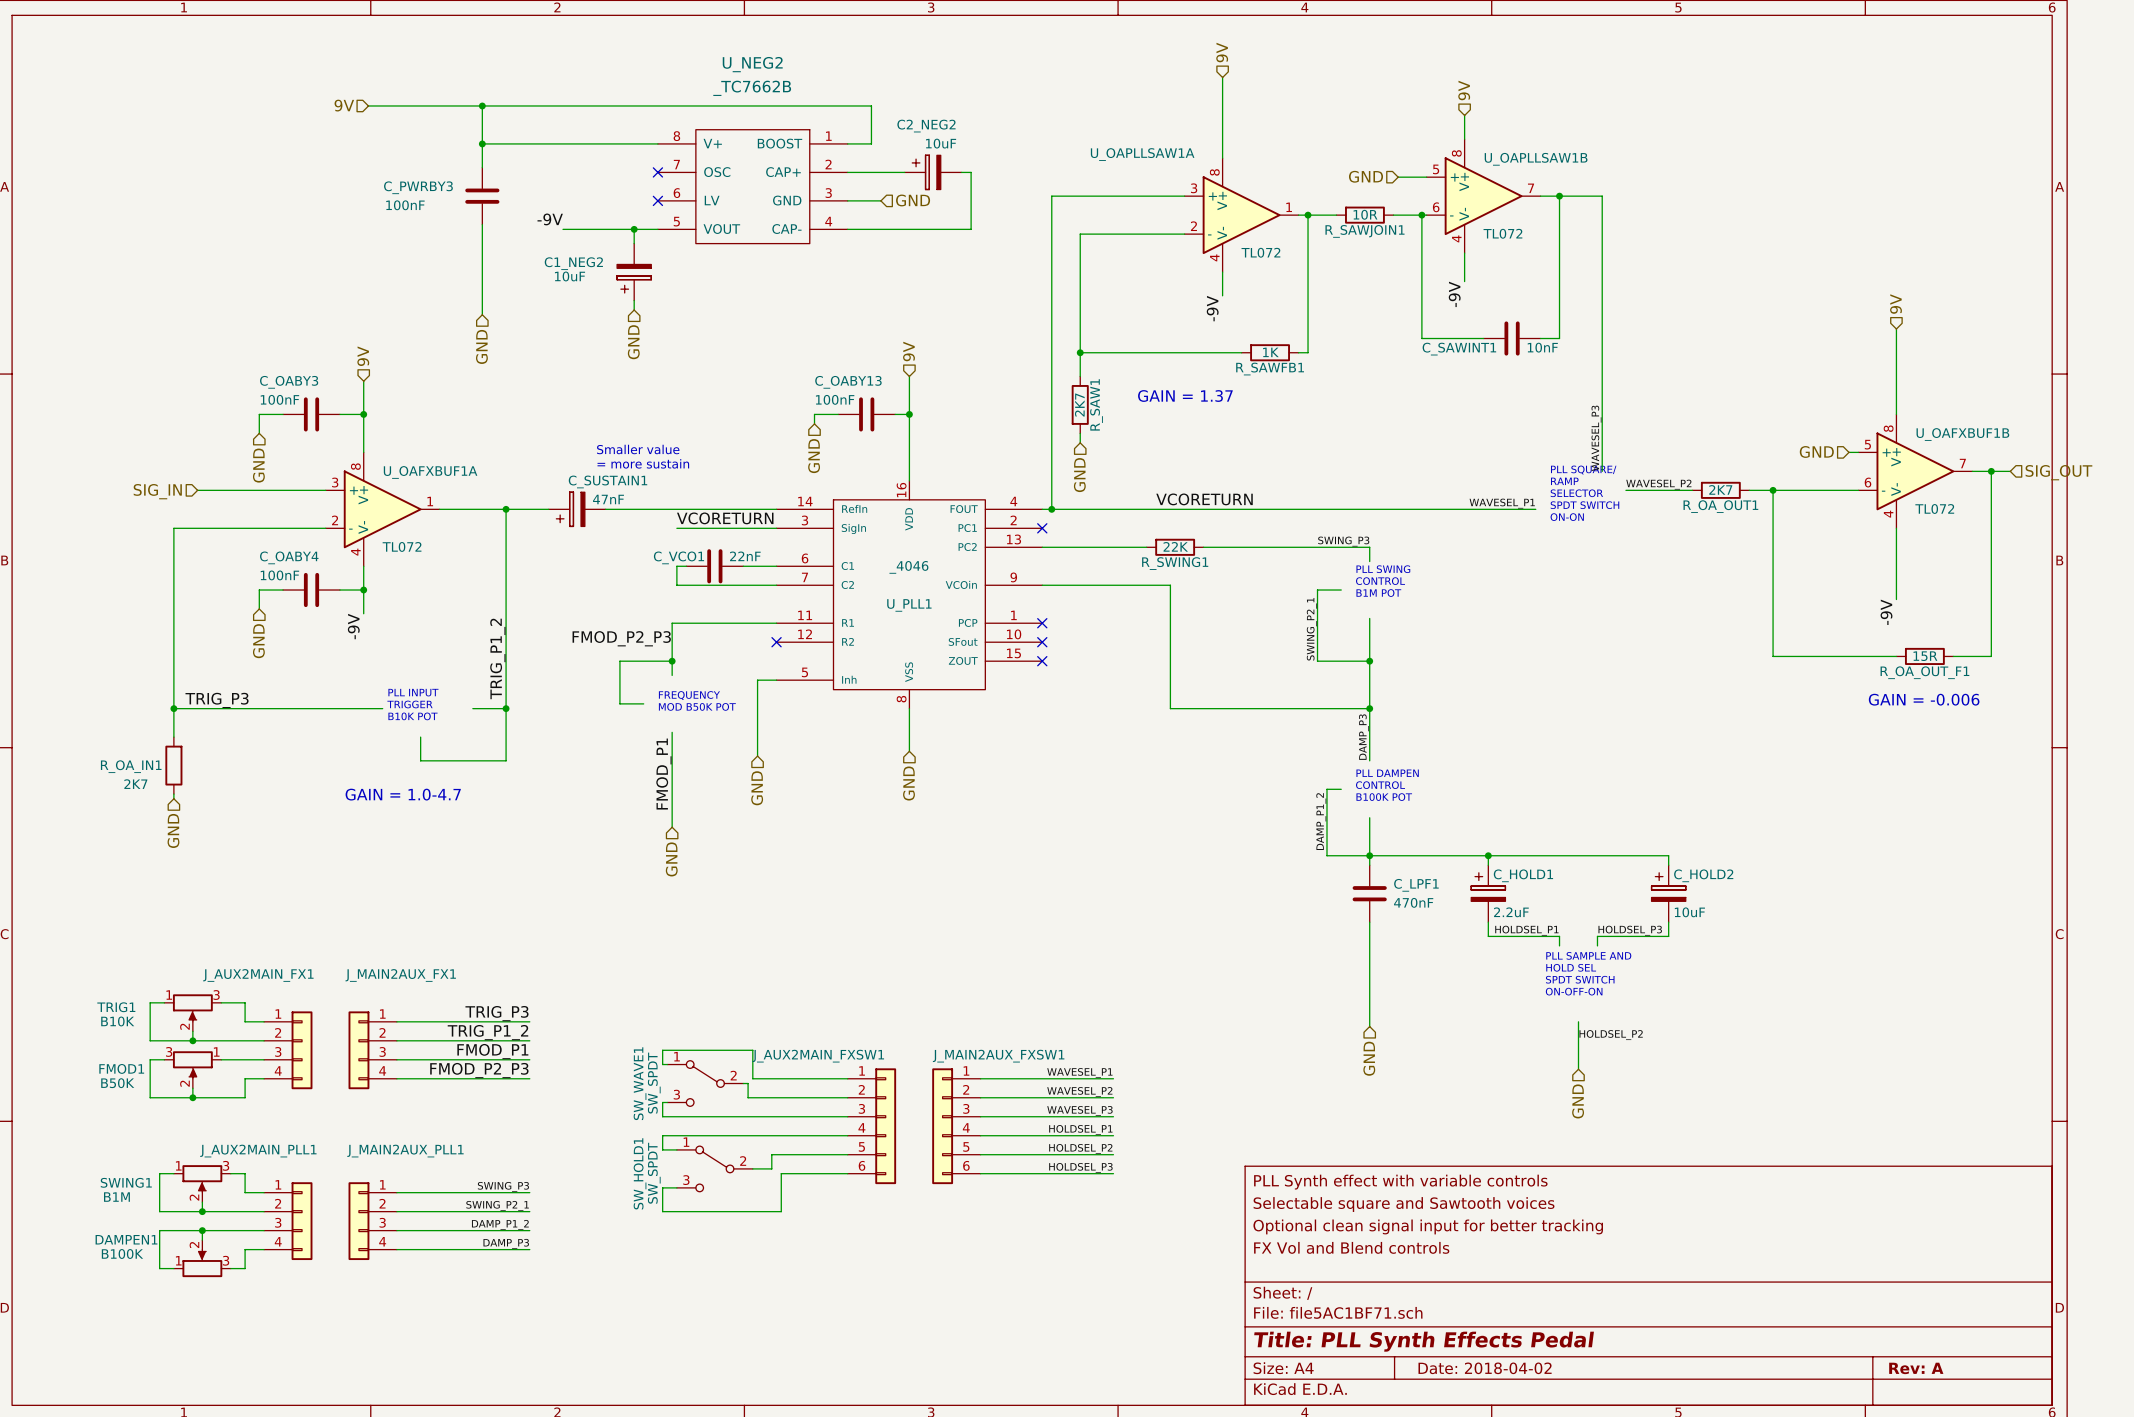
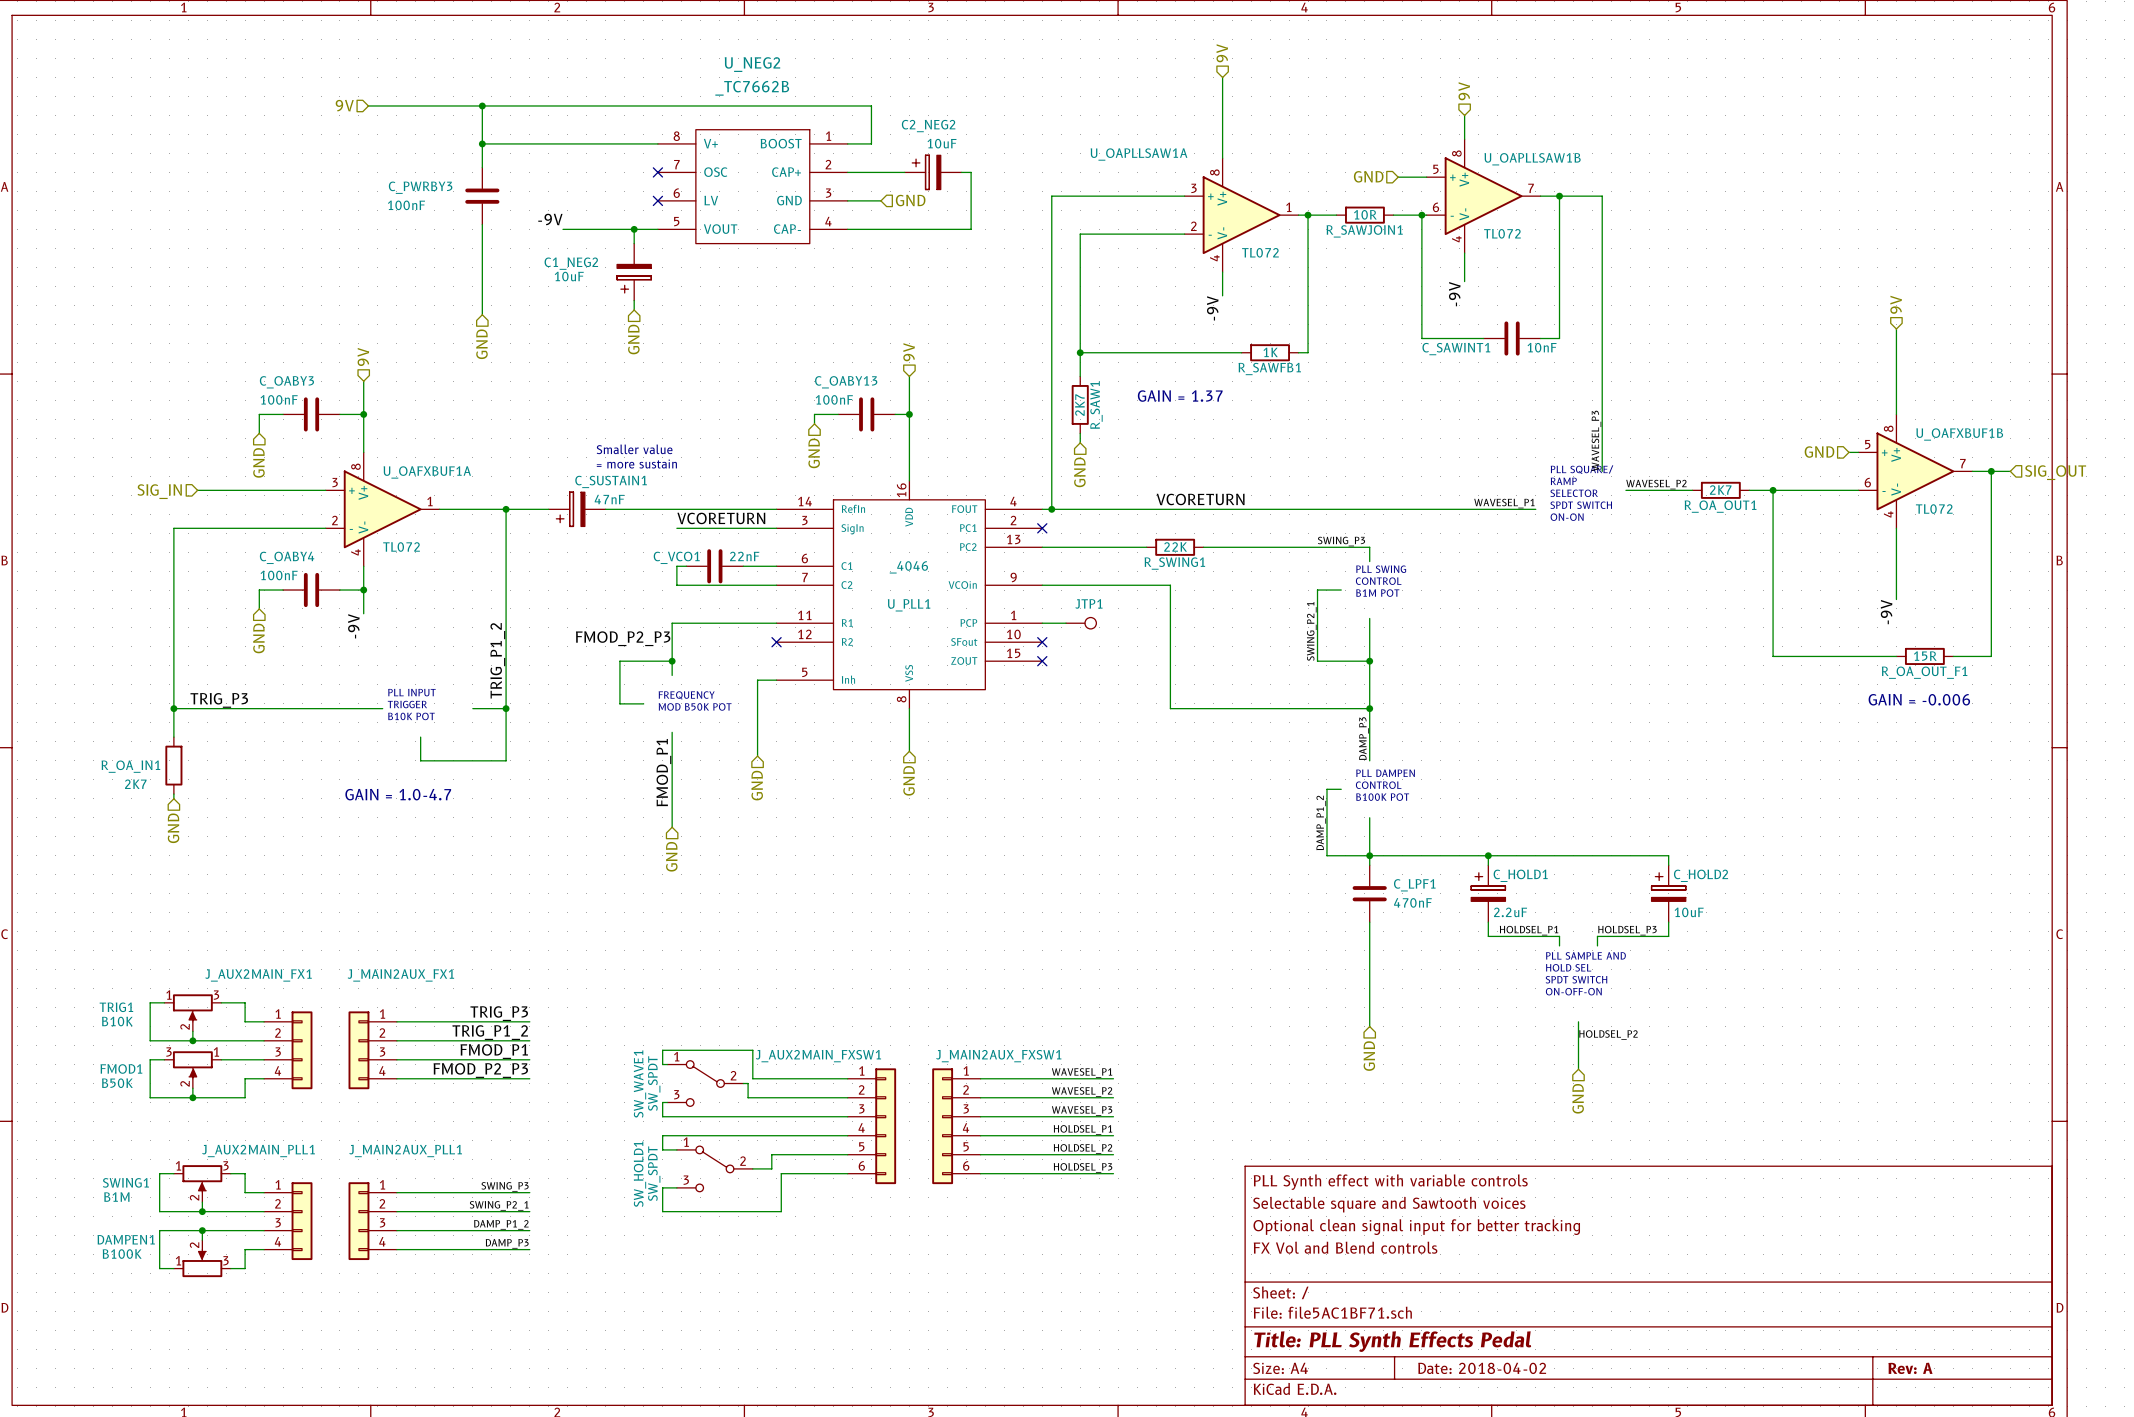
wire: none -> (1042, 623) (1066, 623)
no-connect mark: (1042, 623) -> none
JTP1: none -> (1081, 623)

